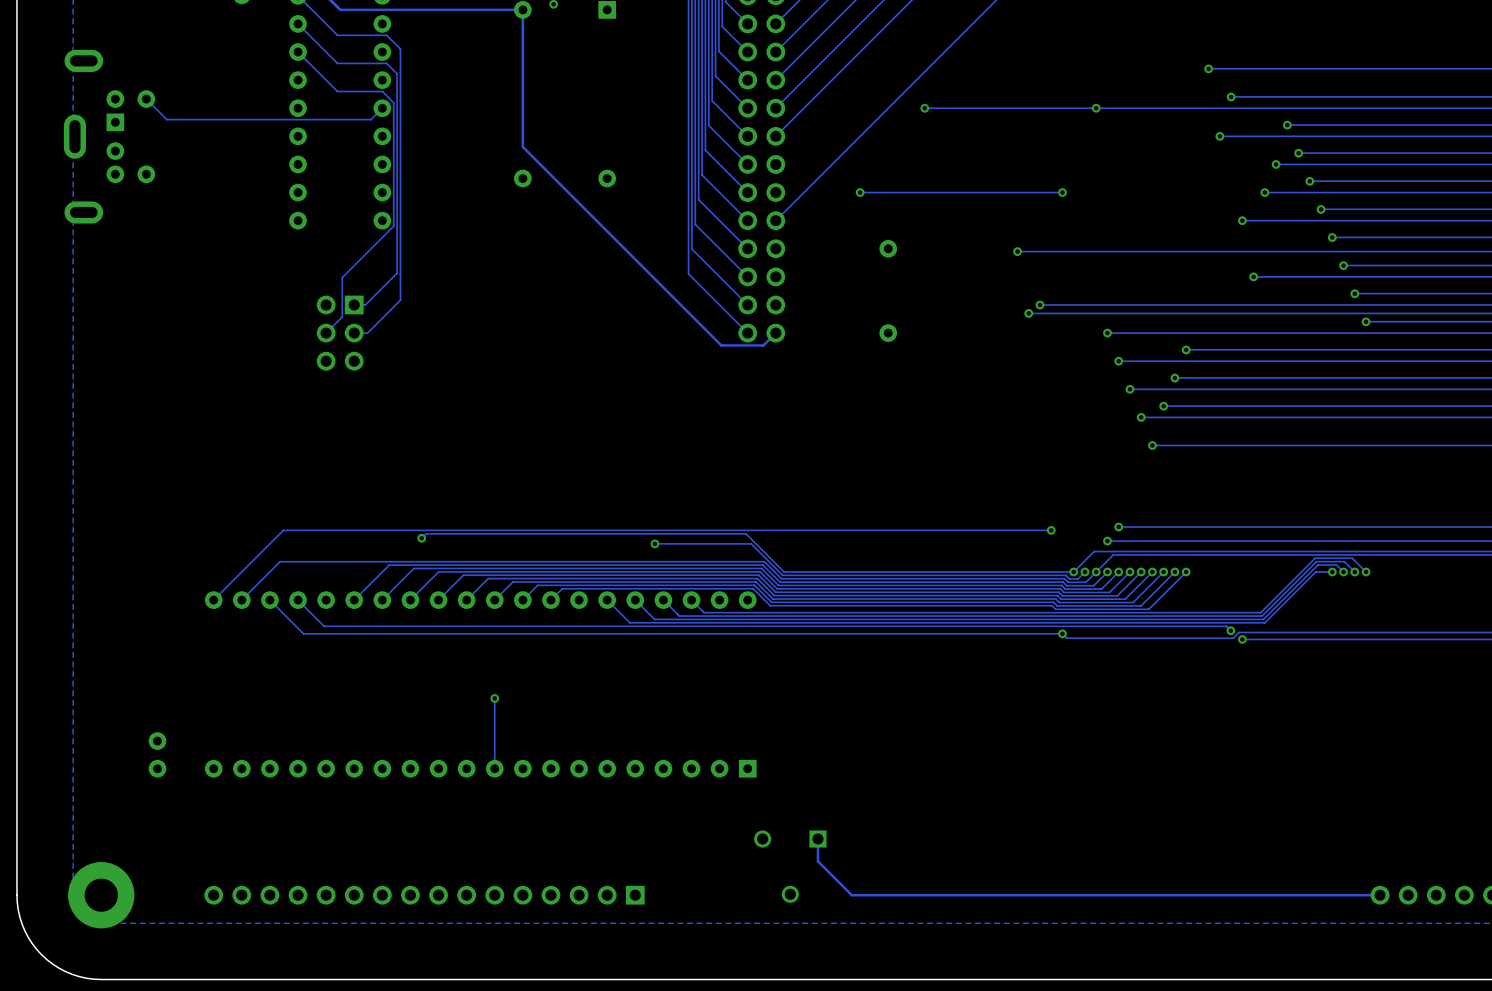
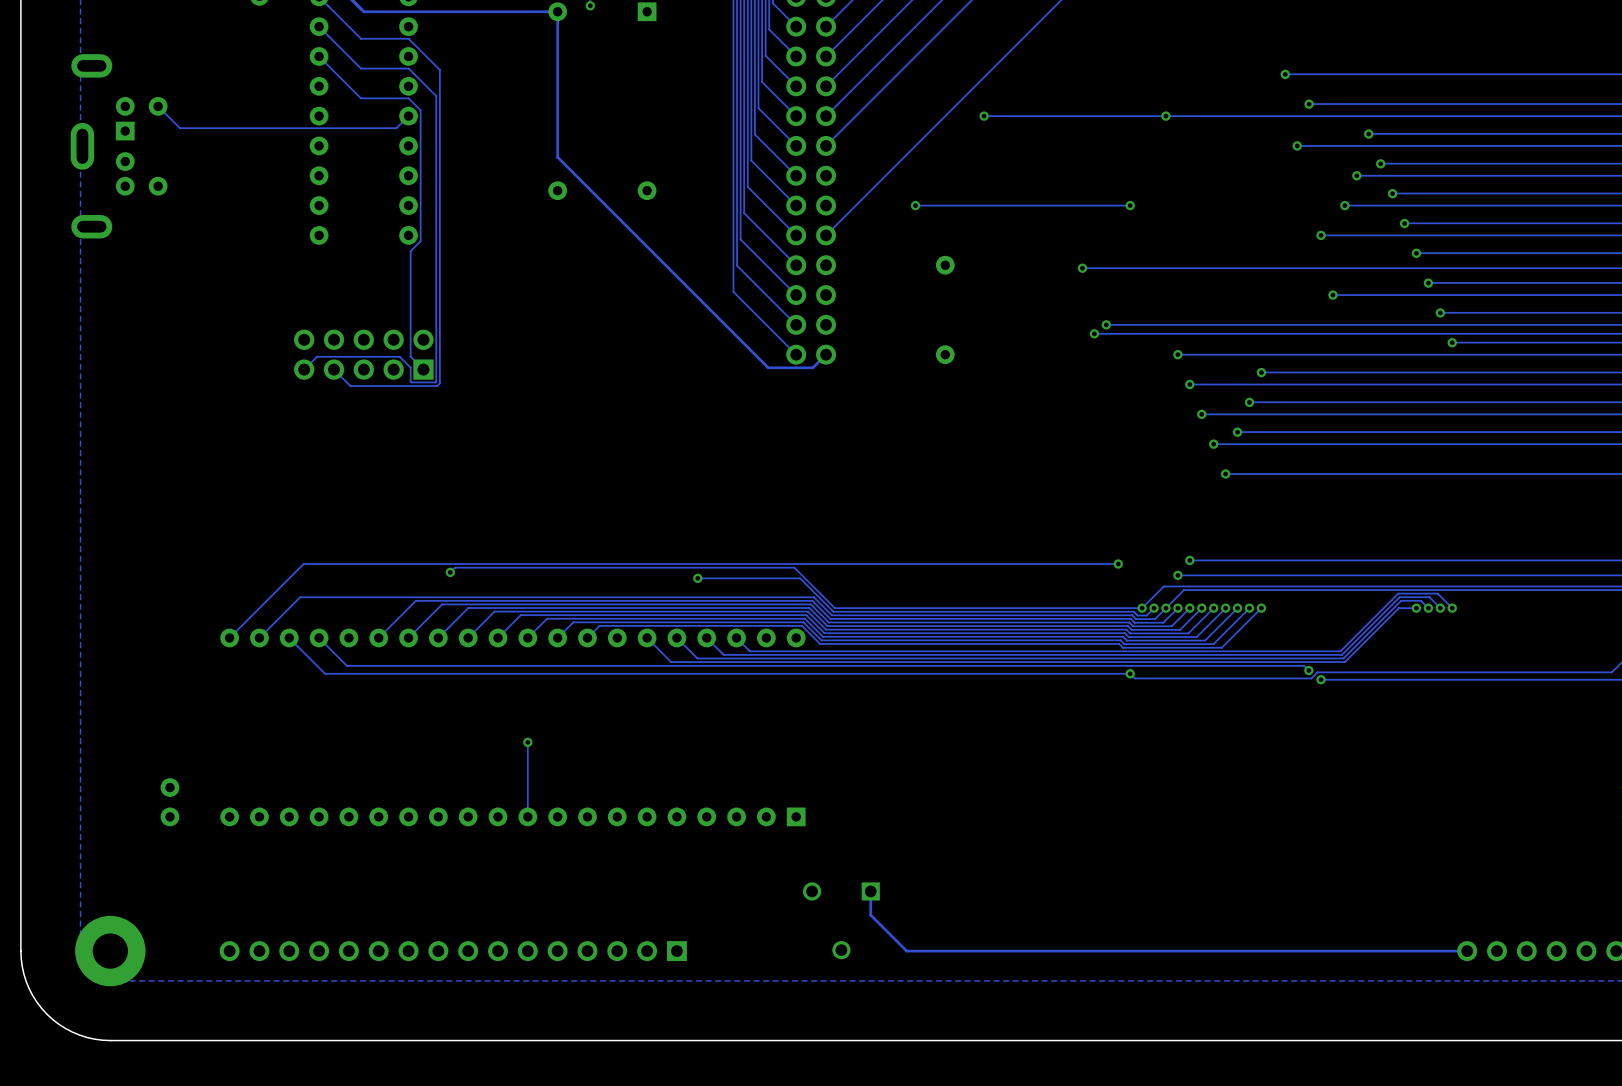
track: (382, 35) (386, 35) (400, 49) (400, 300) (367, 333) (354, 333) -> (408, 38) (439, 69) (439, 383) (437, 386) (350, 386) (334, 369)
track: (382, 63) (386, 63) (397, 73) (397, 273) (365, 304) (354, 304) -> (408, 68) (436, 96) (436, 381) (411, 382) (410, 367) (399, 356) (317, 356) (304, 369)
track: (384, 235) (342, 277) (342, 316) (326, 333) -> (410, 251) (410, 356) (423, 369)
part footprint: [316, 295, 364, 371] -> [294, 329, 434, 380]

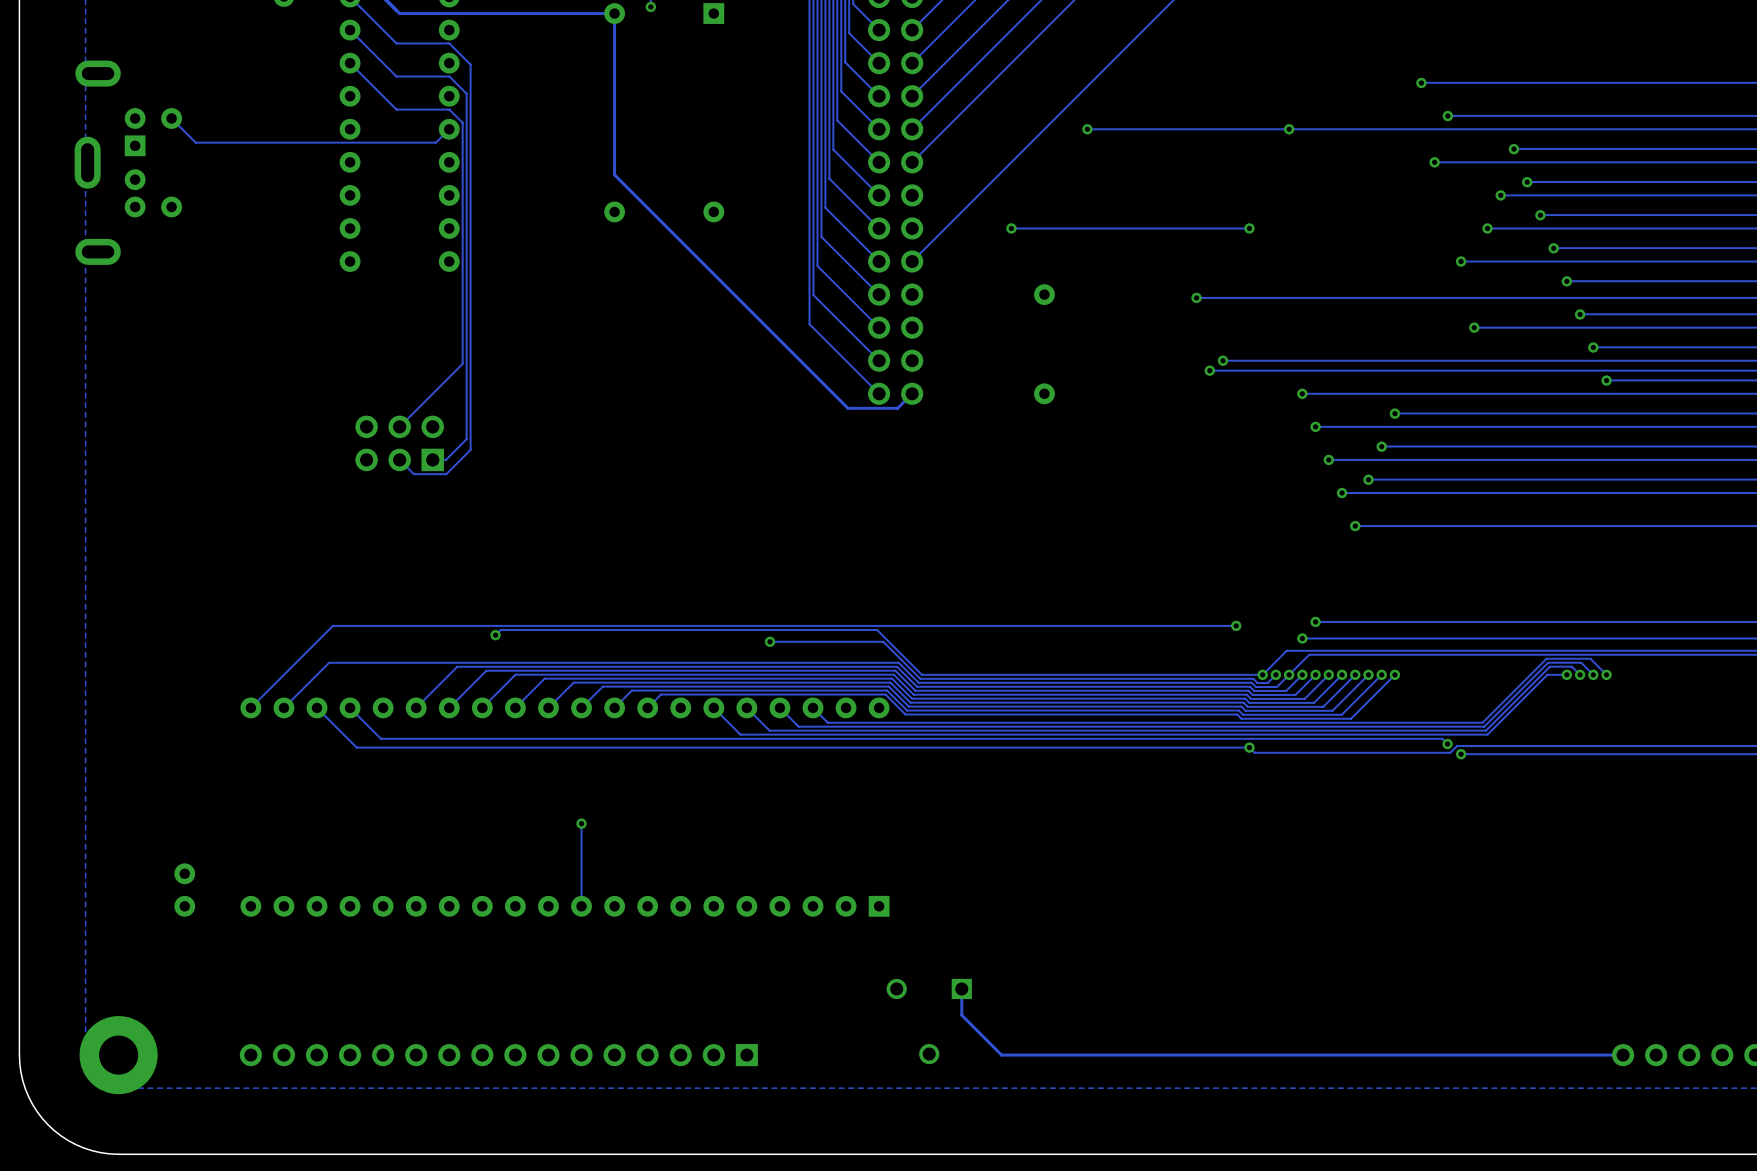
track: (427, 57) (439, 69) (439, 383) (437, 386) (350, 386) (334, 369) -> (470, 64) (470, 449) (446, 474) (413, 474) (399, 459)
track: (424, 84) (436, 96) (436, 381) (411, 382) (410, 367) (399, 356) (317, 356) (304, 369) -> (466, 93) (466, 439) (445, 459) (432, 459)
track: (420, 241) (410, 251) (410, 356) (423, 369) -> (462, 267) (462, 363) (399, 426)
part: (363, 354) -> none
part: none -> (399, 443)

